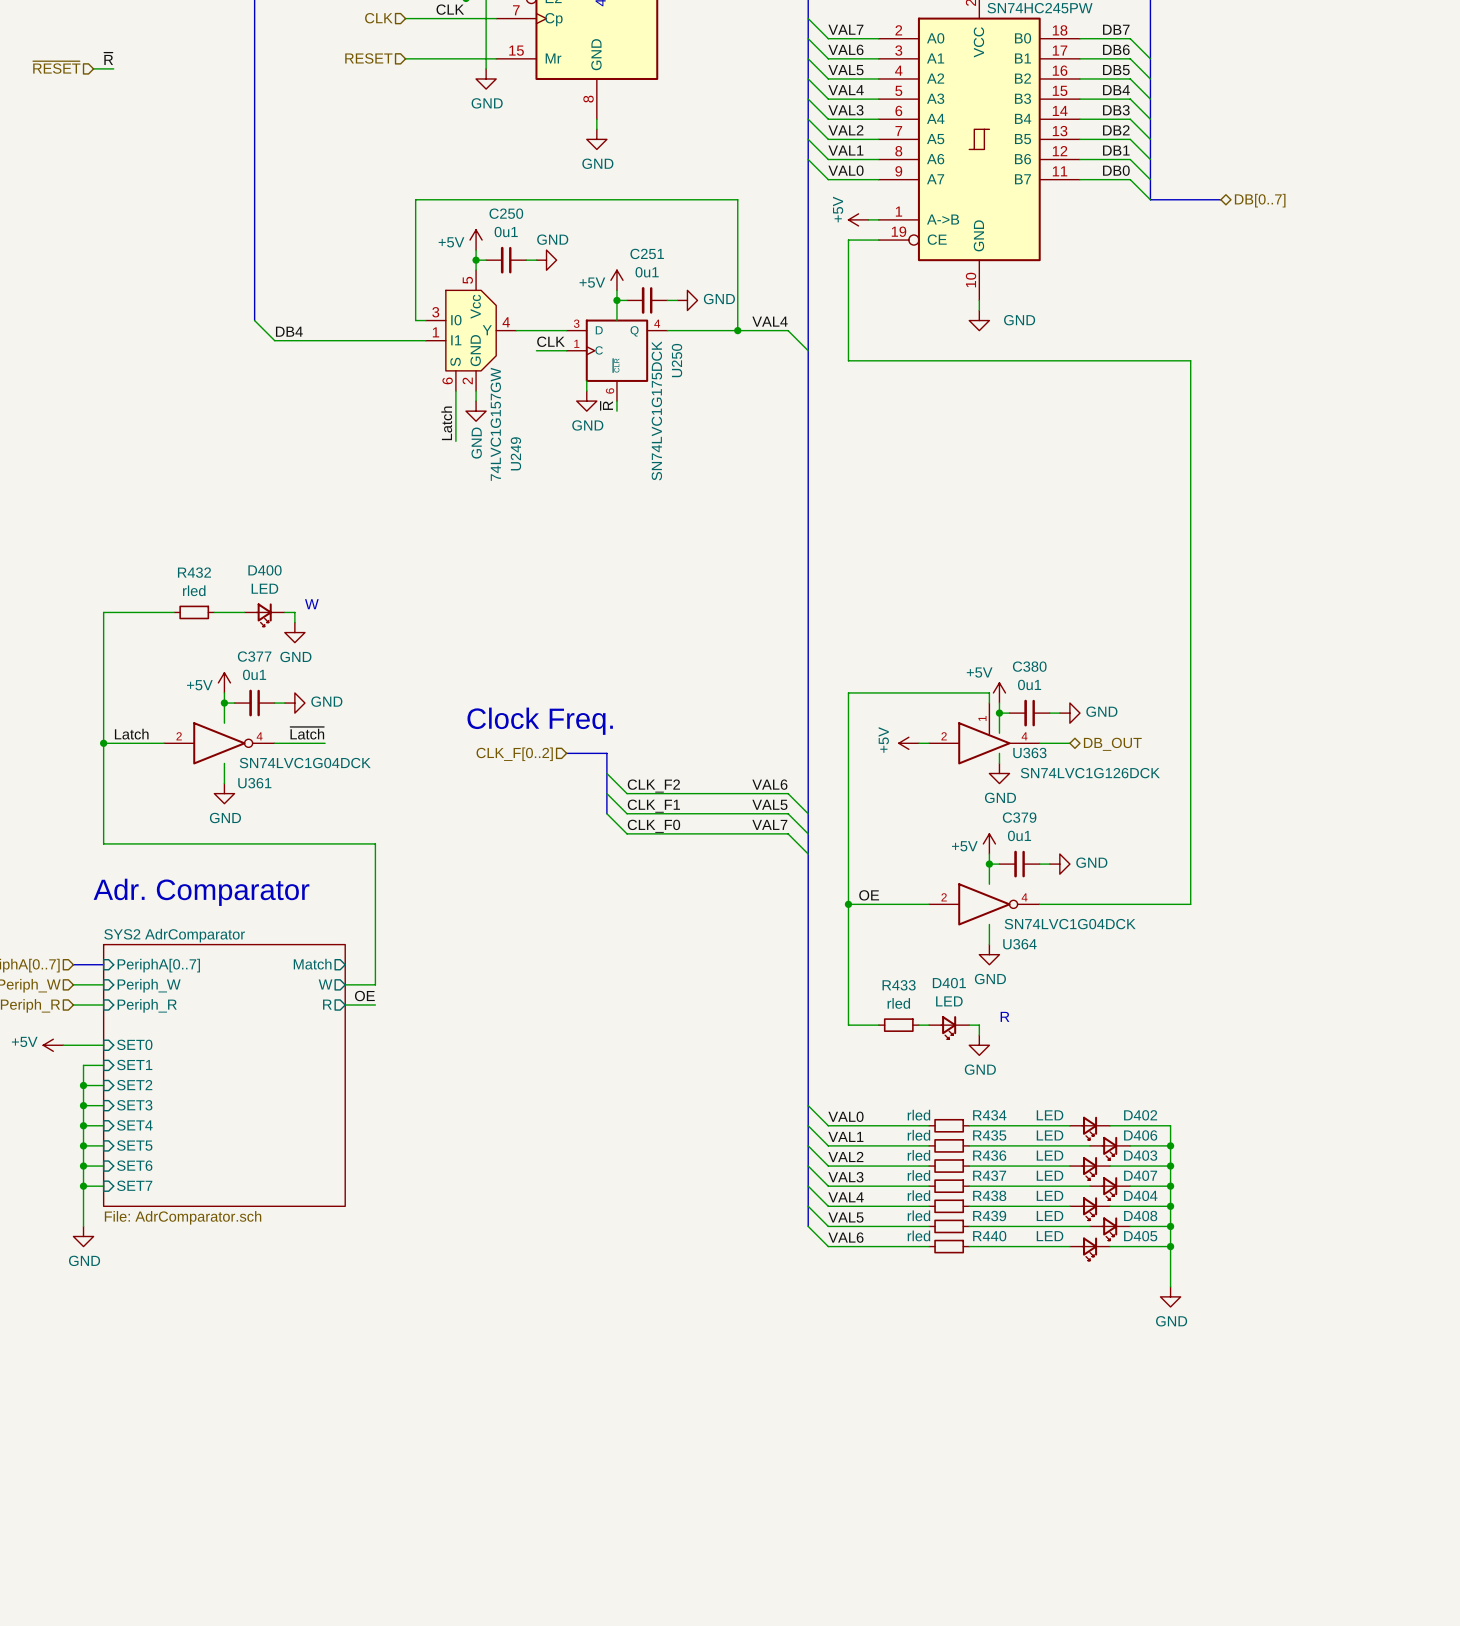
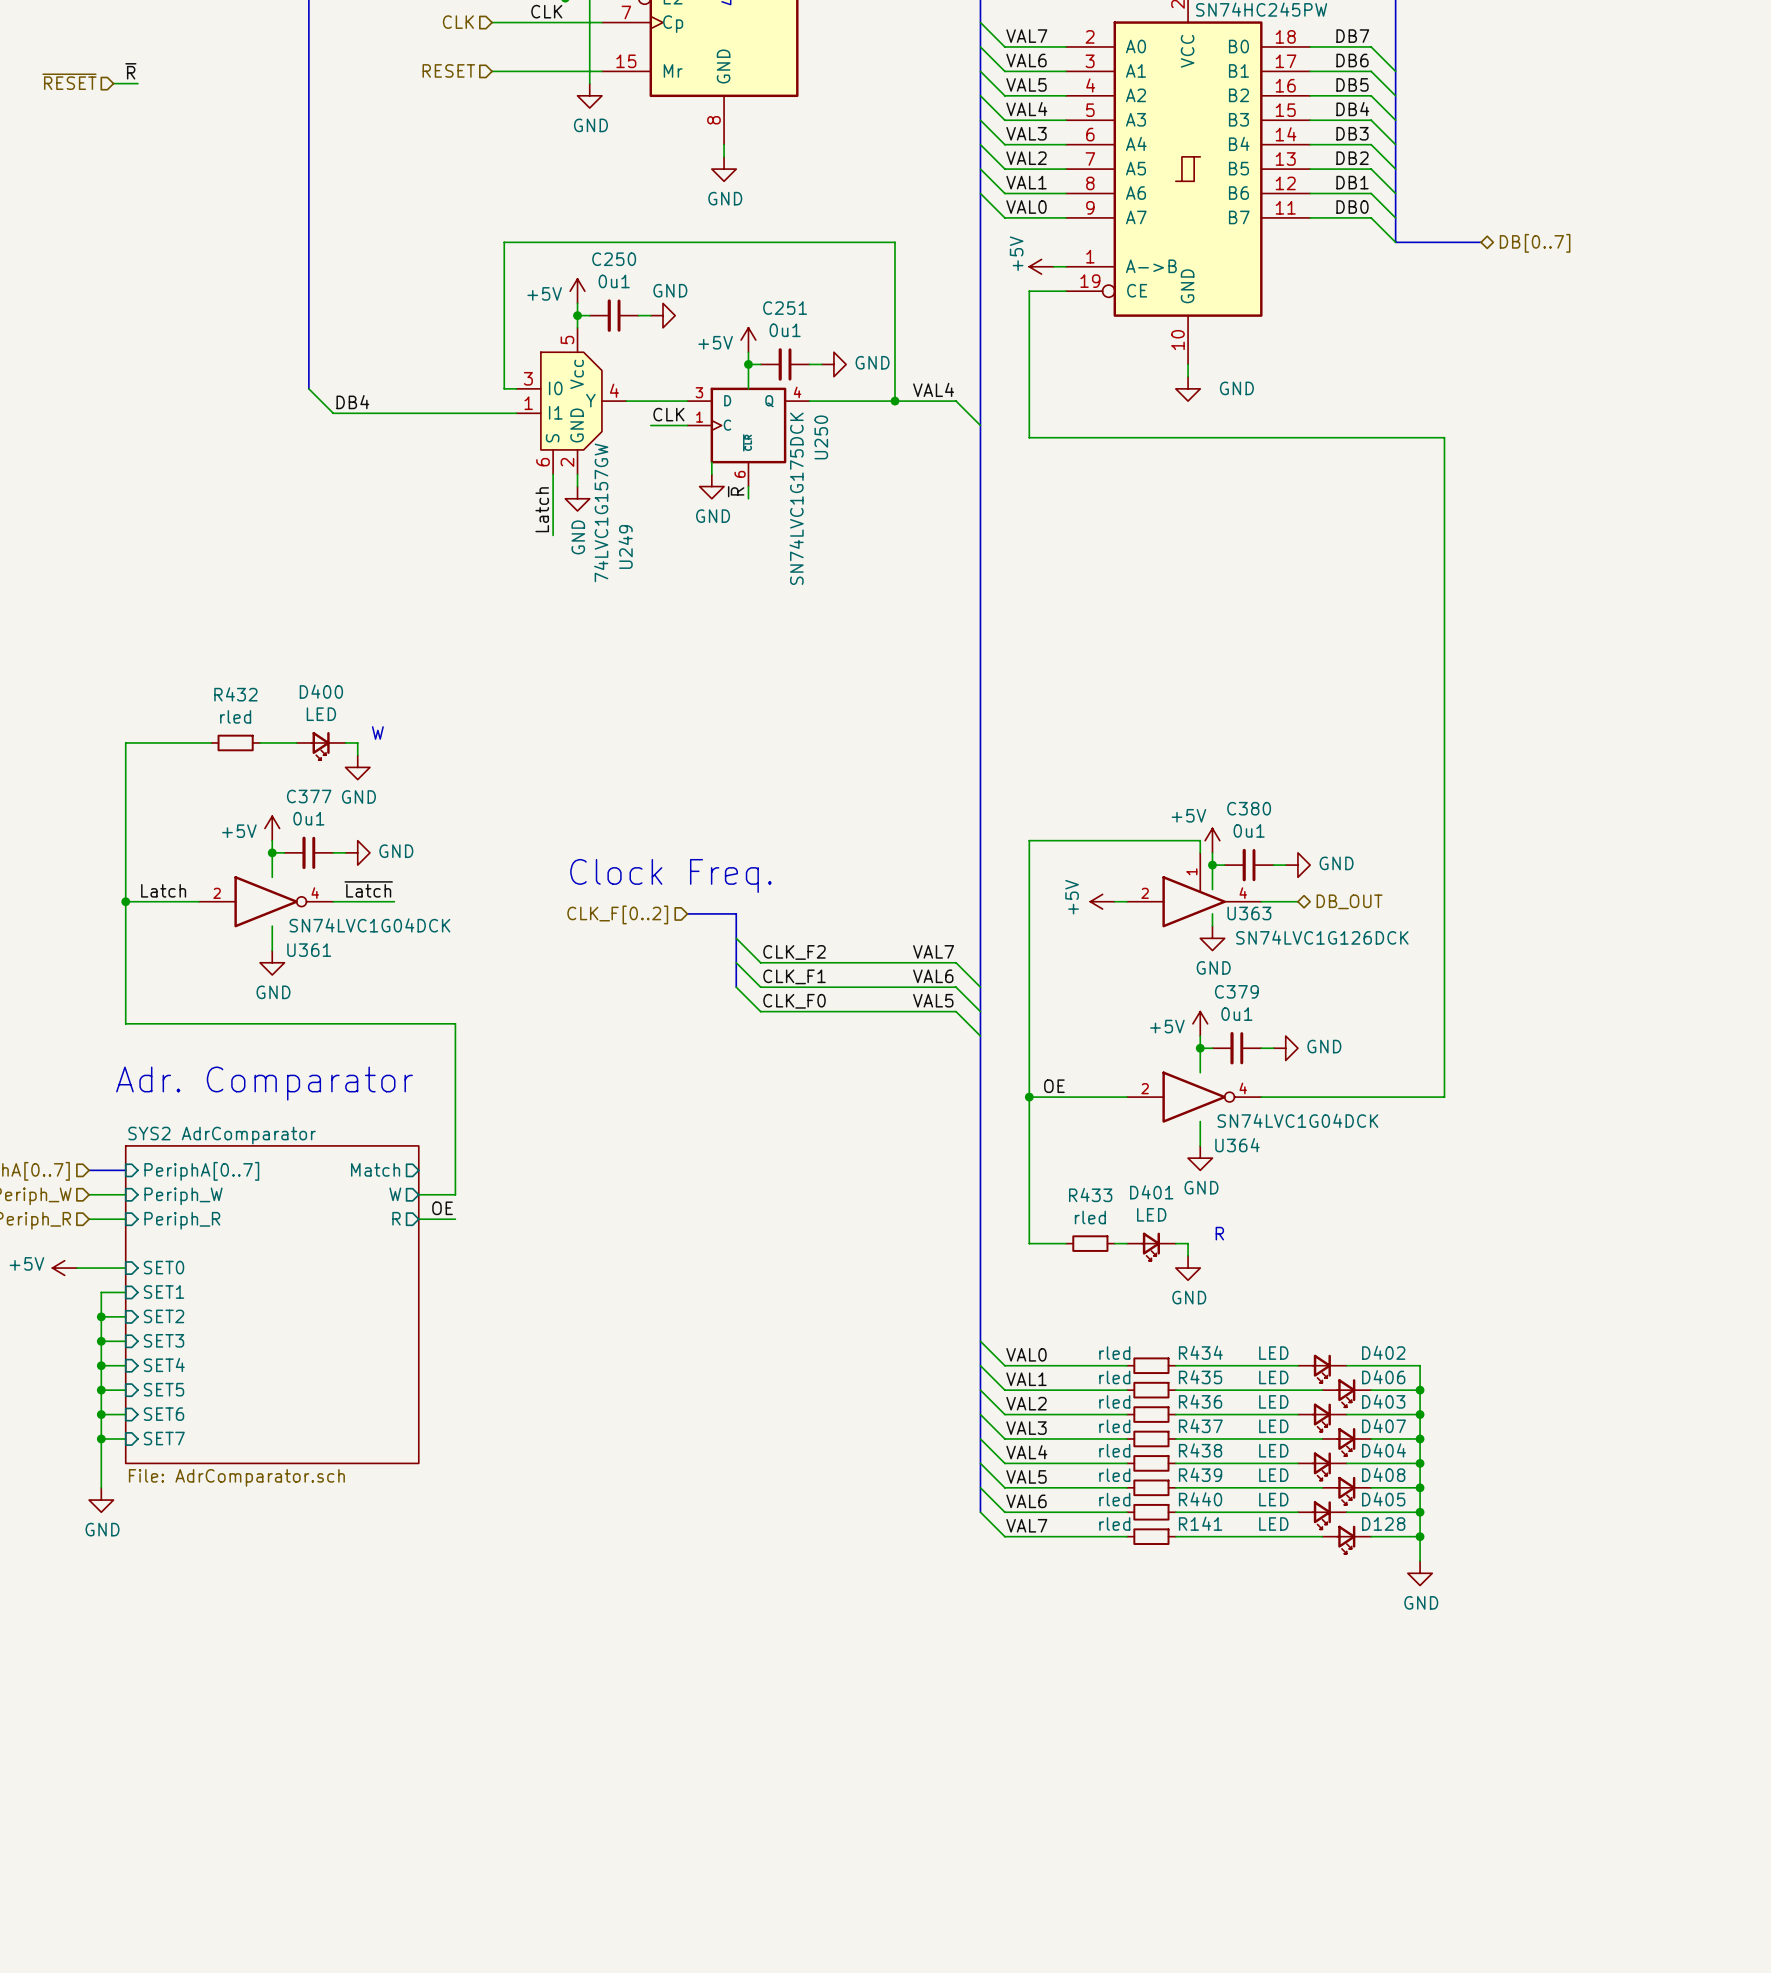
label: VAL6 (769, 784) -> VAL7 (933, 951)
label: VAL5 (769, 804) -> VAL6 (933, 976)
label: VAL7 (769, 824) -> VAL5 (933, 1000)
bus: none -> (980, 1487) (980, 1512)
wire: none -> (980, 1512) (1004, 1536) (1127, 1536)
label: none -> VAL7 (1026, 1525)
R141: none -> rled (1151, 1536)
wire: none -> (1175, 1536) (1322, 1536)
wire: none -> (1371, 1536) (1420, 1536)
junction: none -> (1420, 1536)
D128: none -> LED (1346, 1539)

